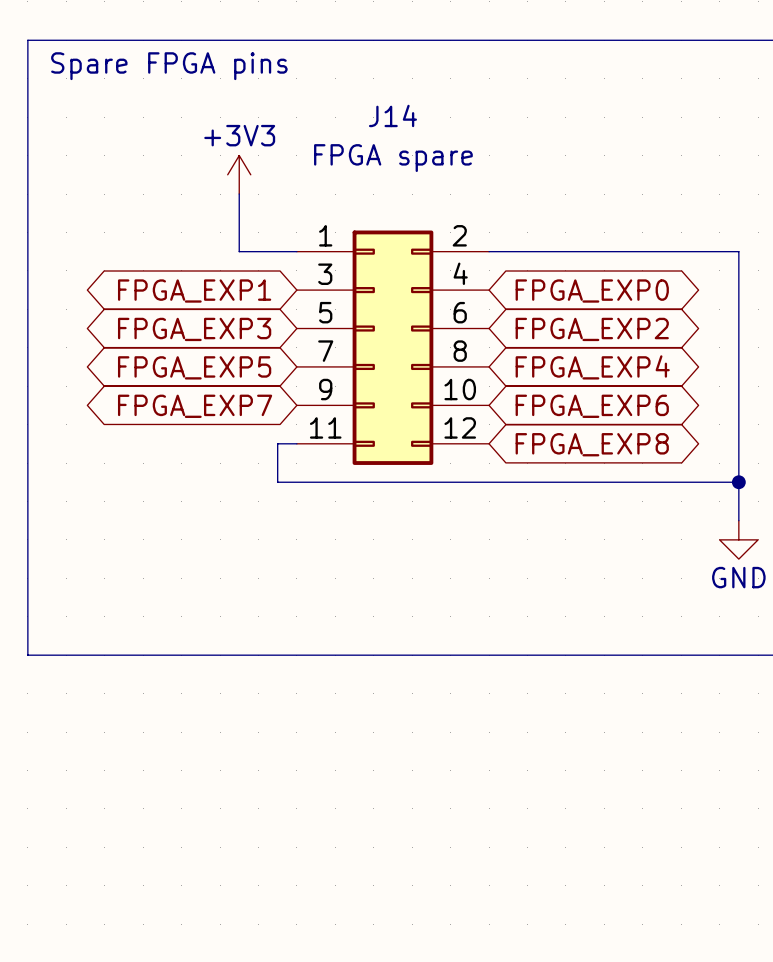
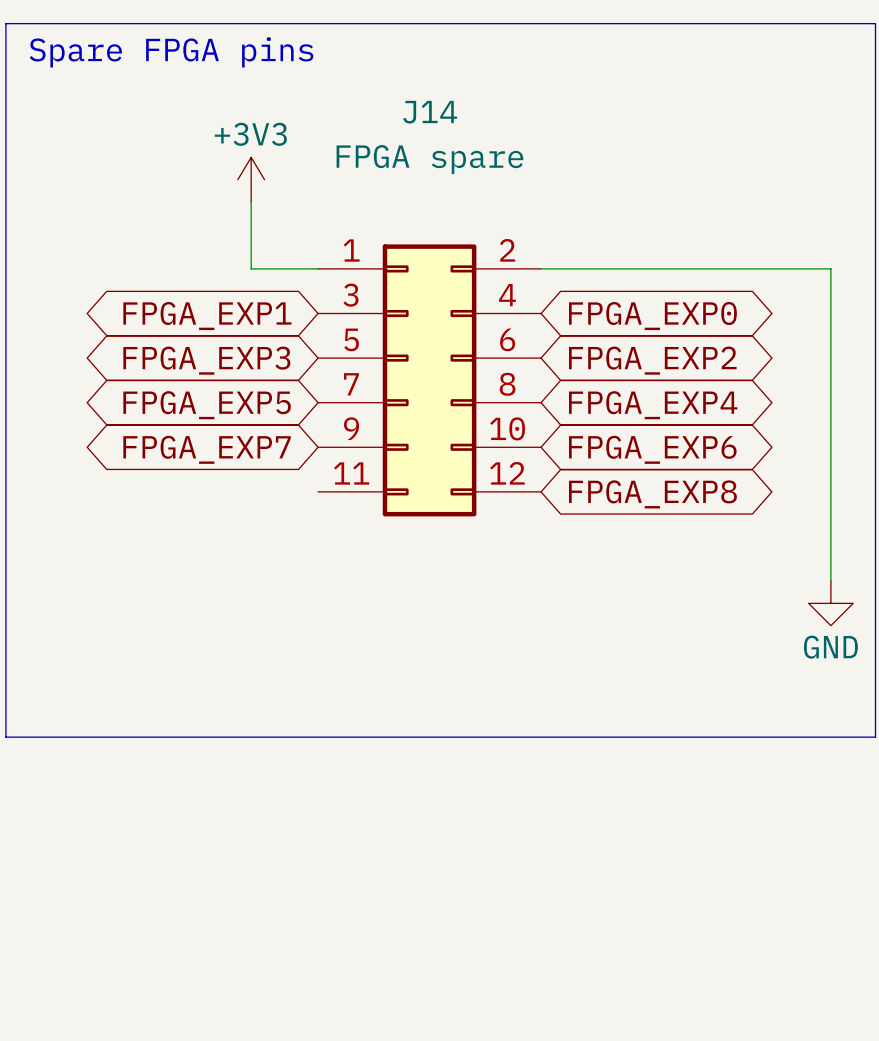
wire: (296, 443) (277, 443) (277, 482) (738, 482) -> none
junction: (738, 482) -> none

